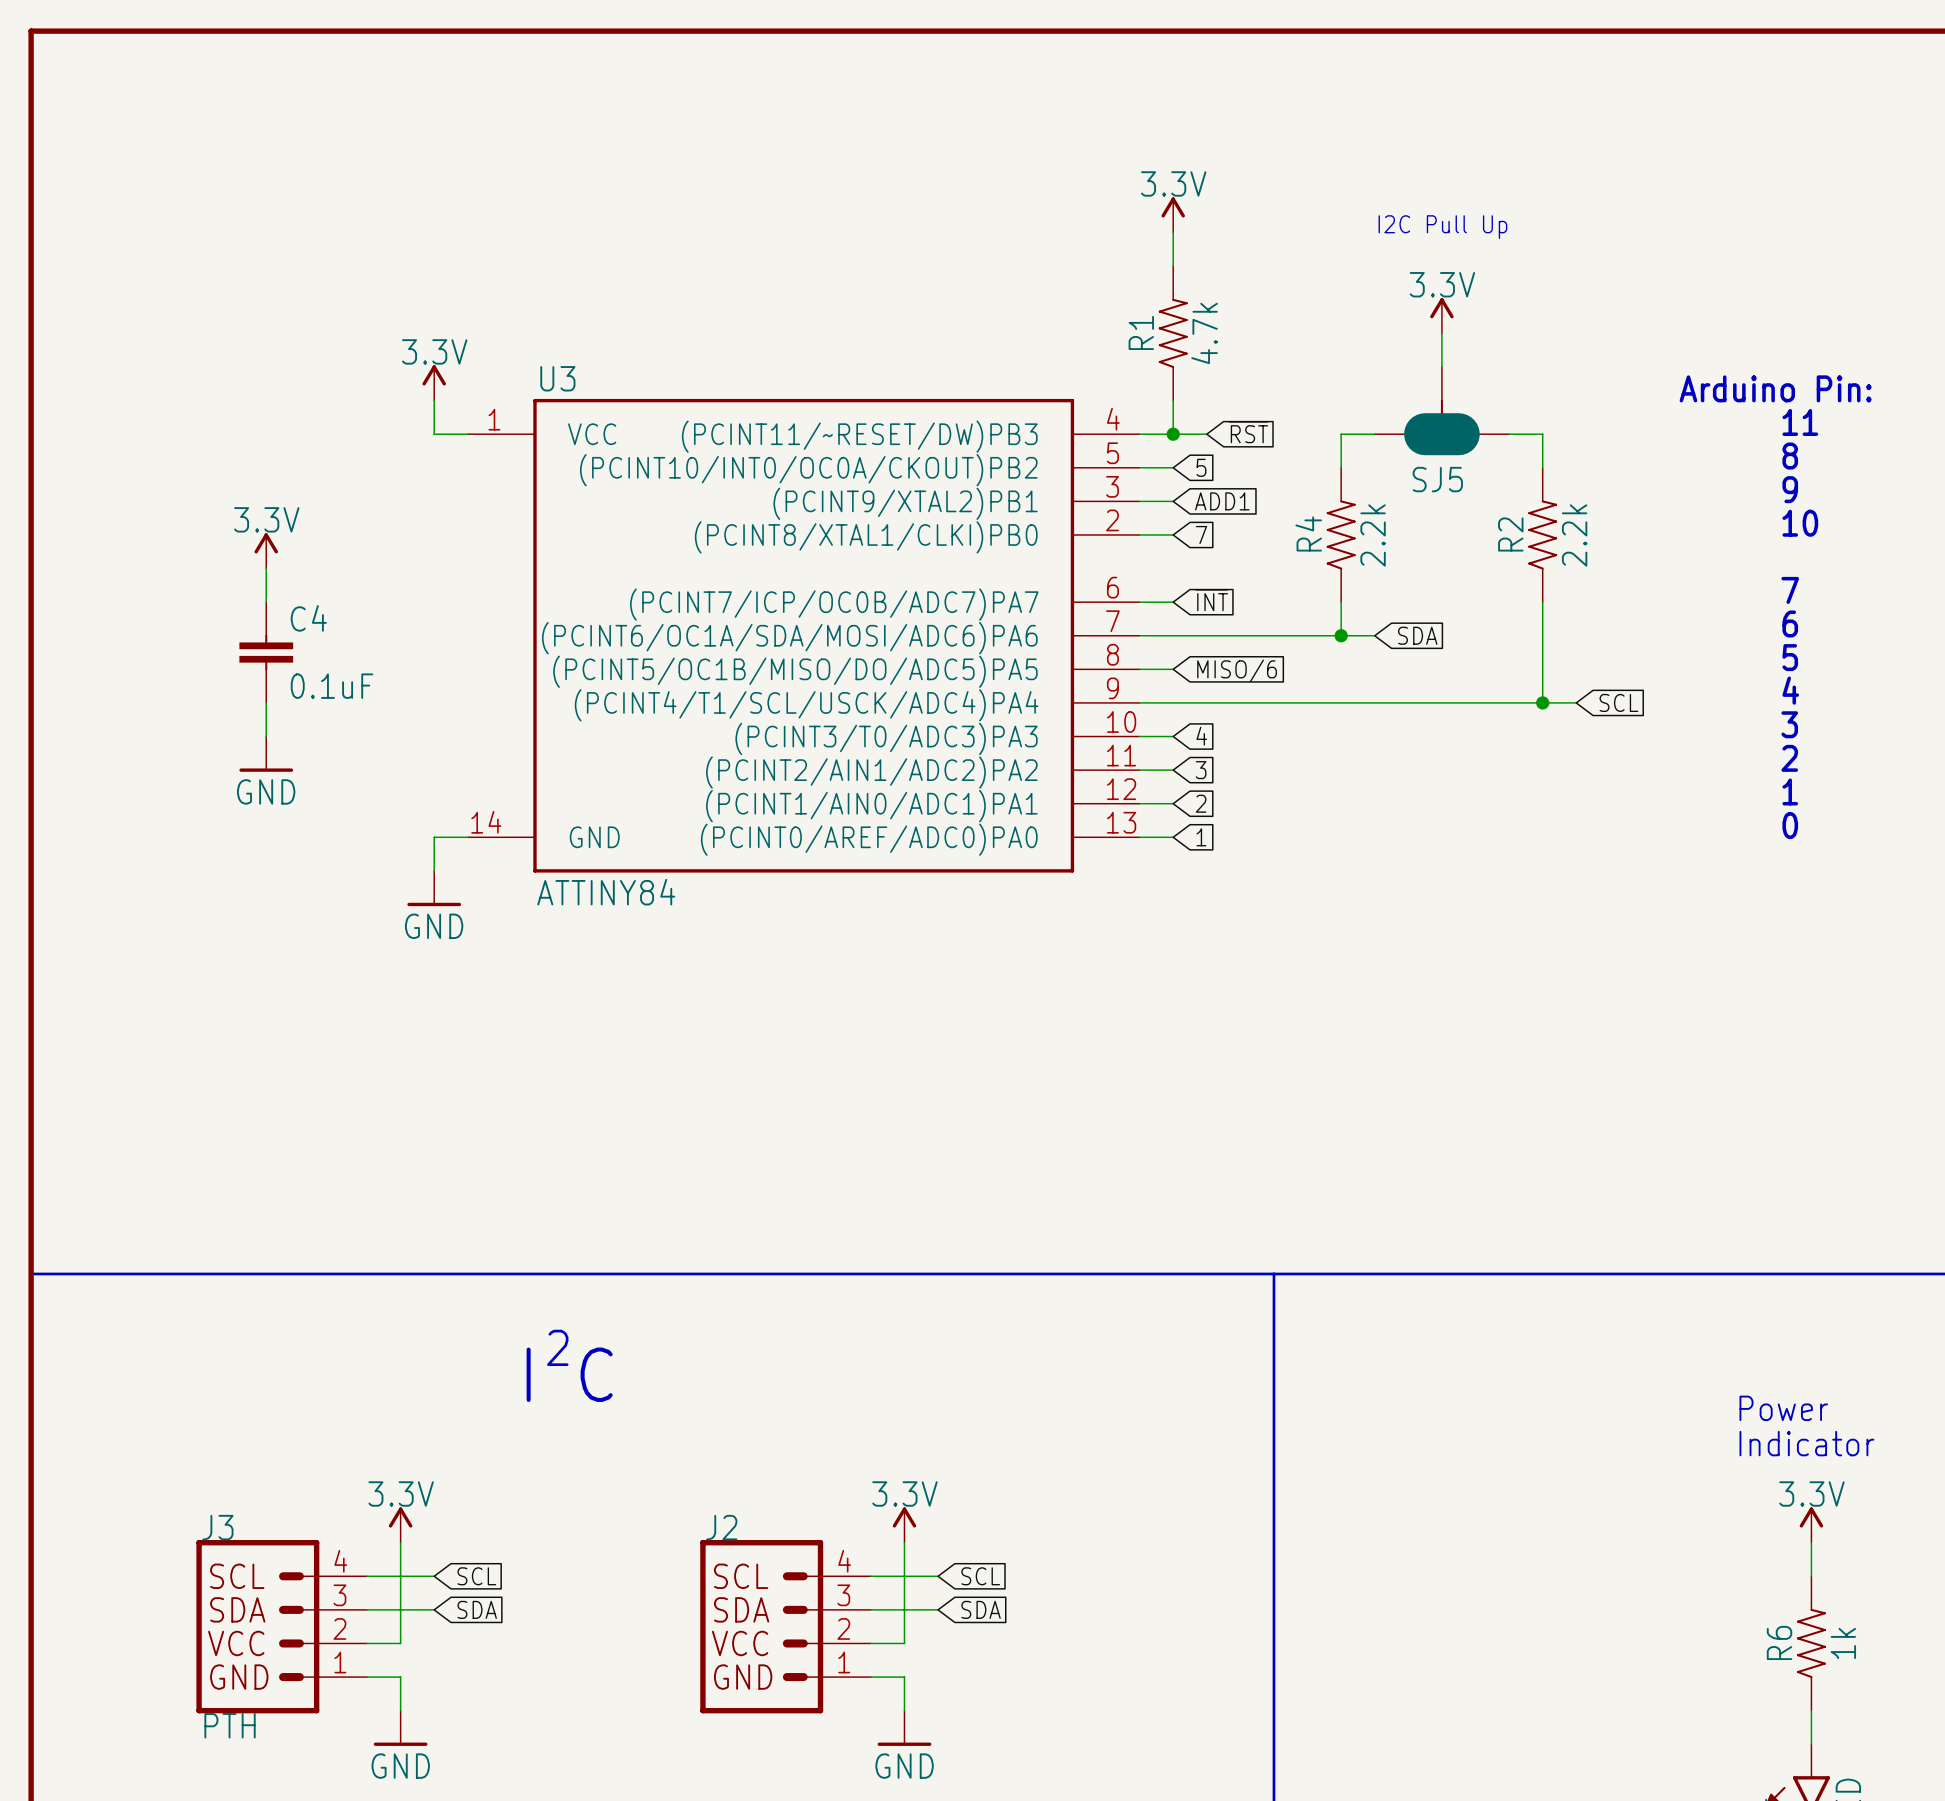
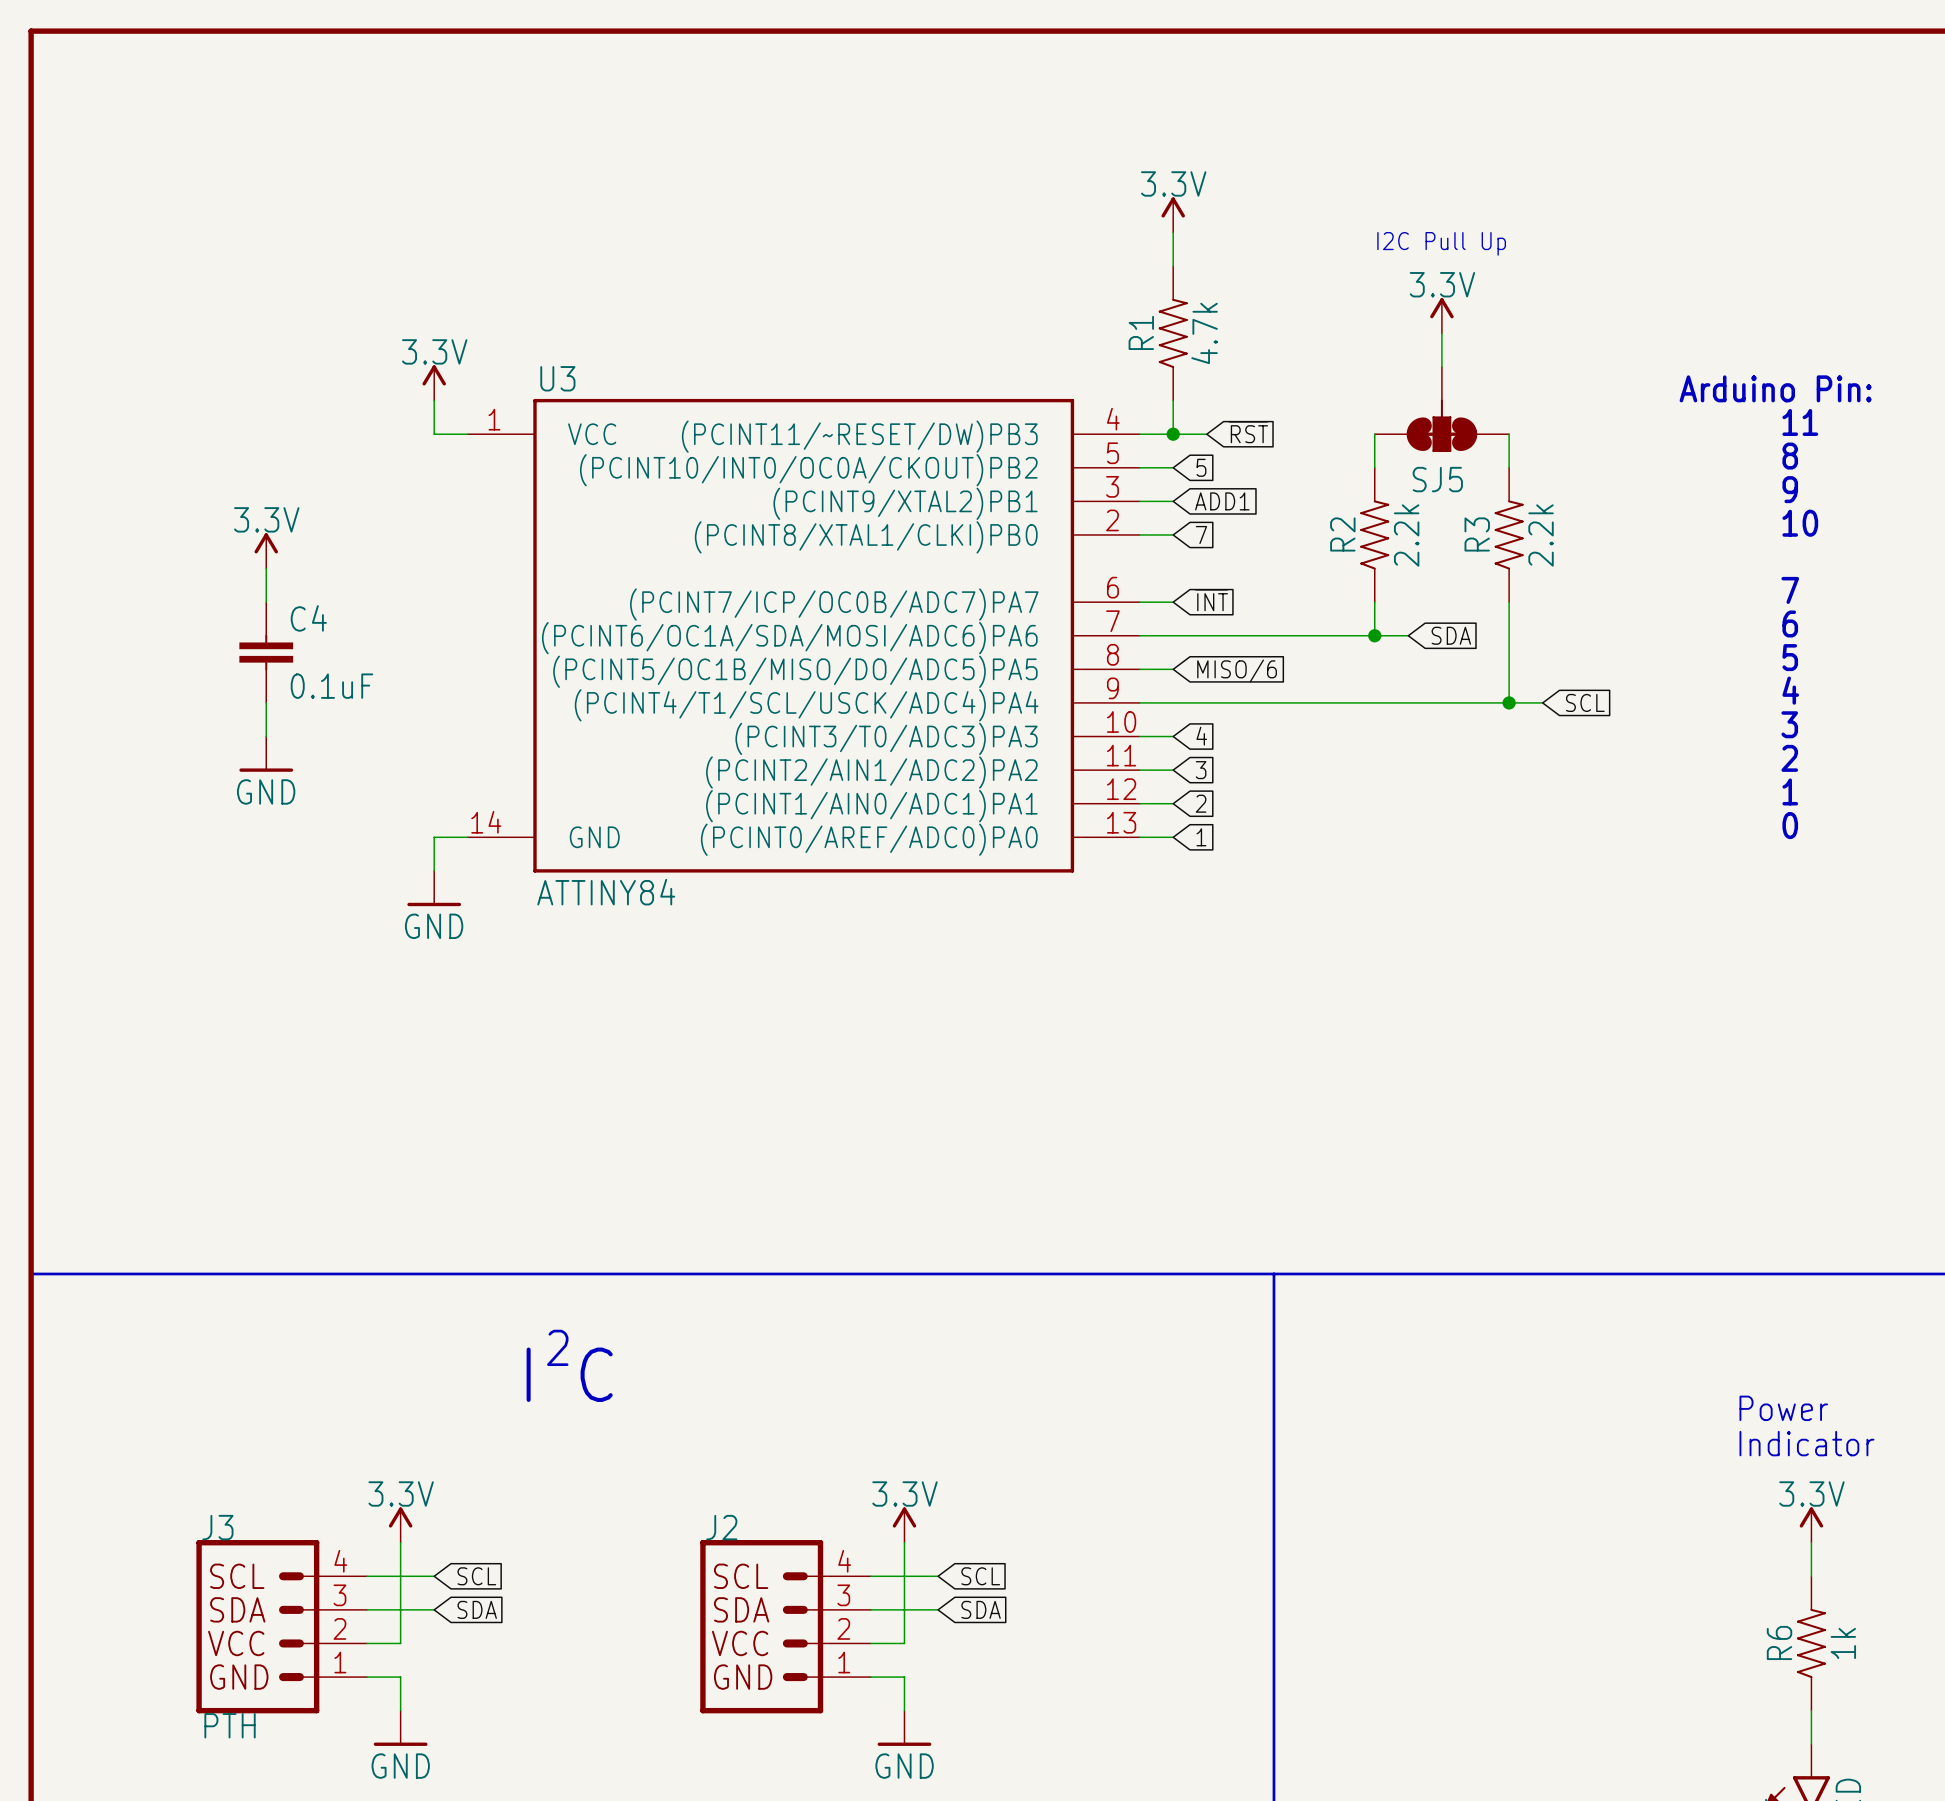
text position: I2C Pull Up (1442, 227) -> I2C Pull Up (1441, 243)
SJ5 symbol: [1374, 367, 1510, 456] -> [1374, 367, 1510, 453]
wire: (1374, 434) (1341, 434) (1341, 467) -> (1374, 434) (1374, 467)
wire: (1509, 434) (1542, 434) (1542, 467) -> (1509, 434) (1509, 467)
R4: 2.2k (1341, 534) -> none
R3: none -> 2.2k (1509, 534)
R2 position: (1542, 534) -> (1374, 534)
wire: (1341, 602) (1341, 635) -> none
wire: none -> (1374, 602) (1374, 635) (1408, 635)
wire: none -> (1509, 602) (1509, 702)
wire: (1542, 602) (1542, 702) (1576, 702) -> none
junction position: (1341, 635) -> (1374, 635)
global label position: SDA (1417, 635) -> SDA (1451, 635)
junction position: (1542, 702) -> (1509, 702)
global label position: SCL (1618, 702) -> SCL (1585, 702)

